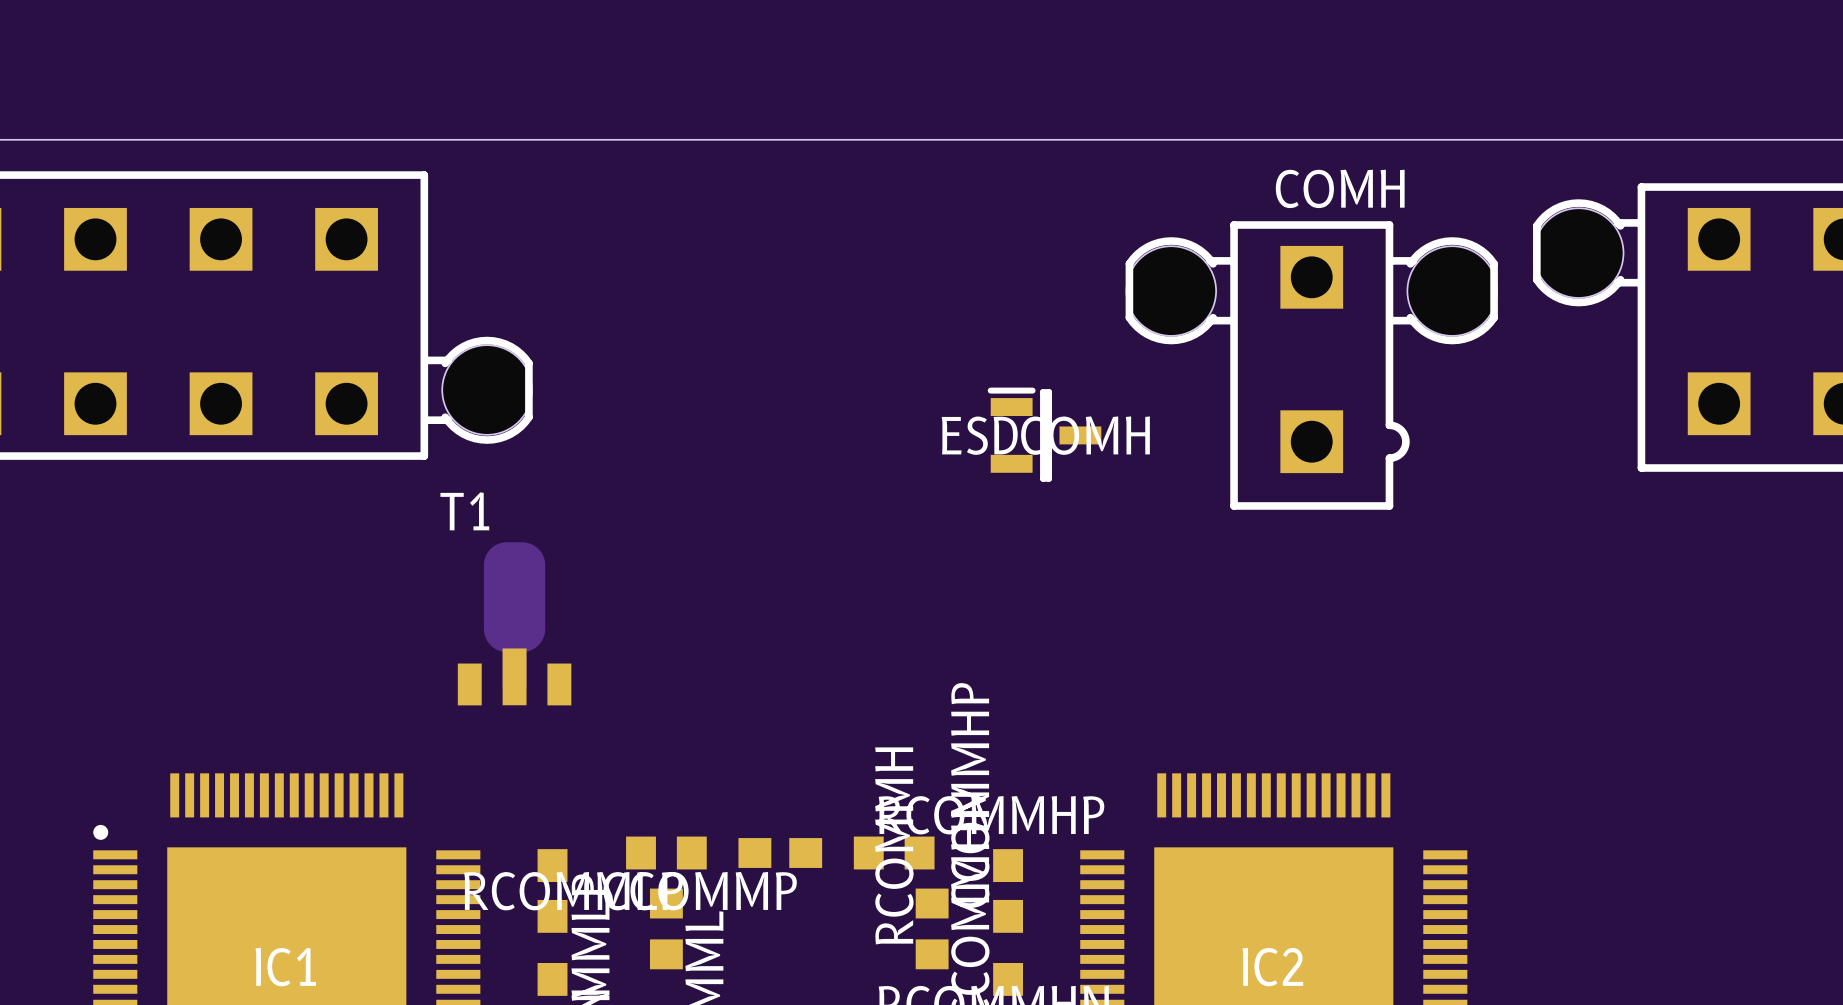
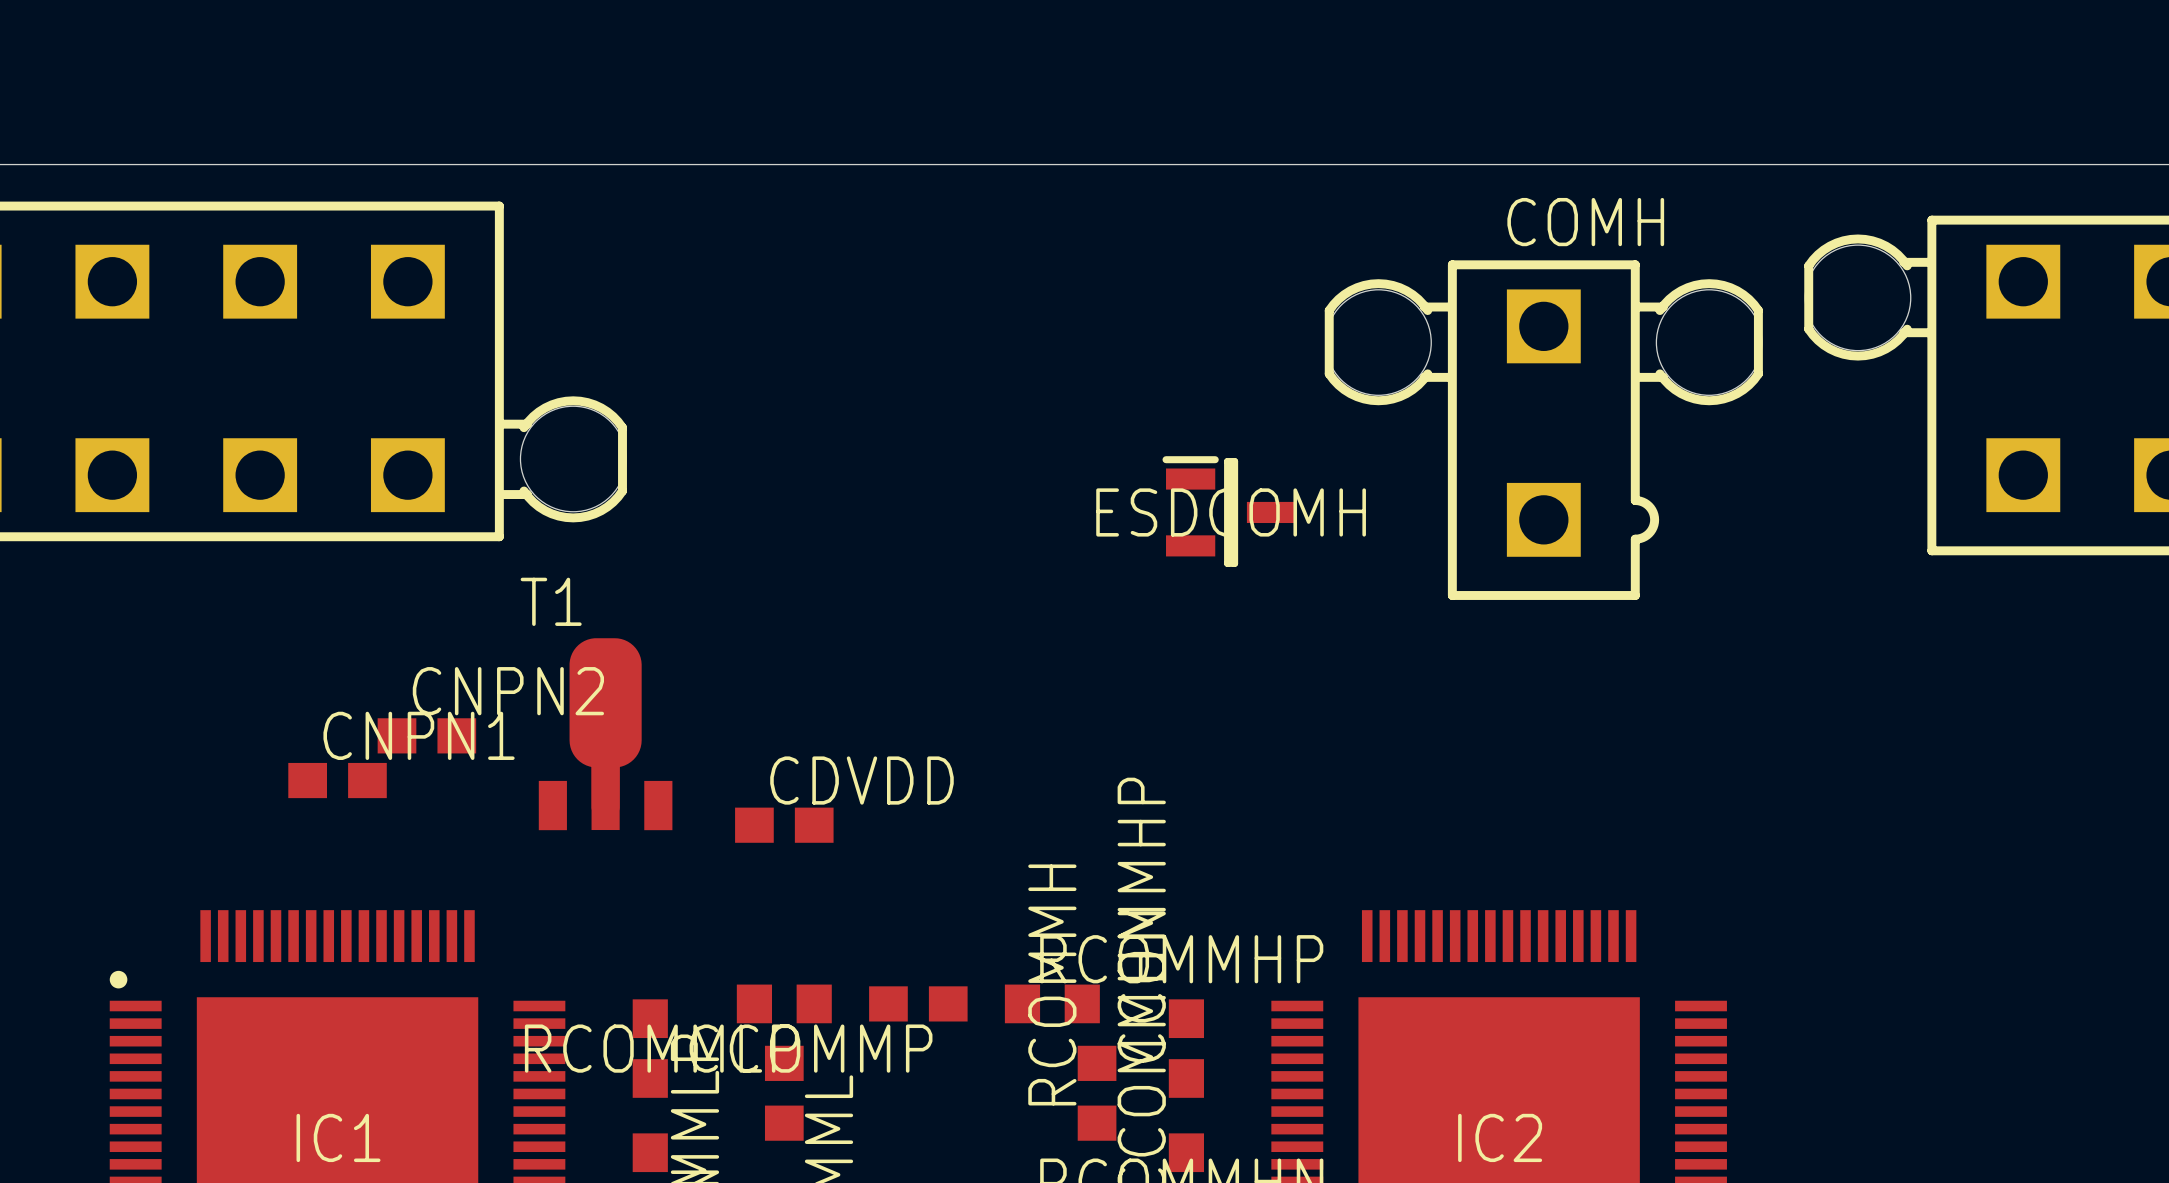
CNPN2: none -> (426, 735)
CNPN1: none -> (337, 780)
CDVDD: none -> (784, 825)

